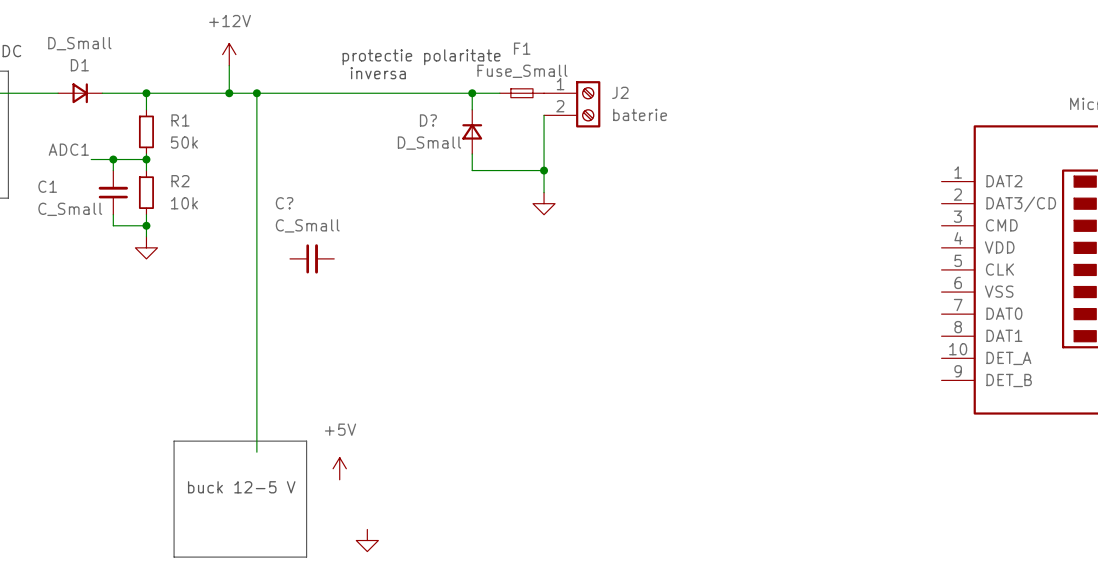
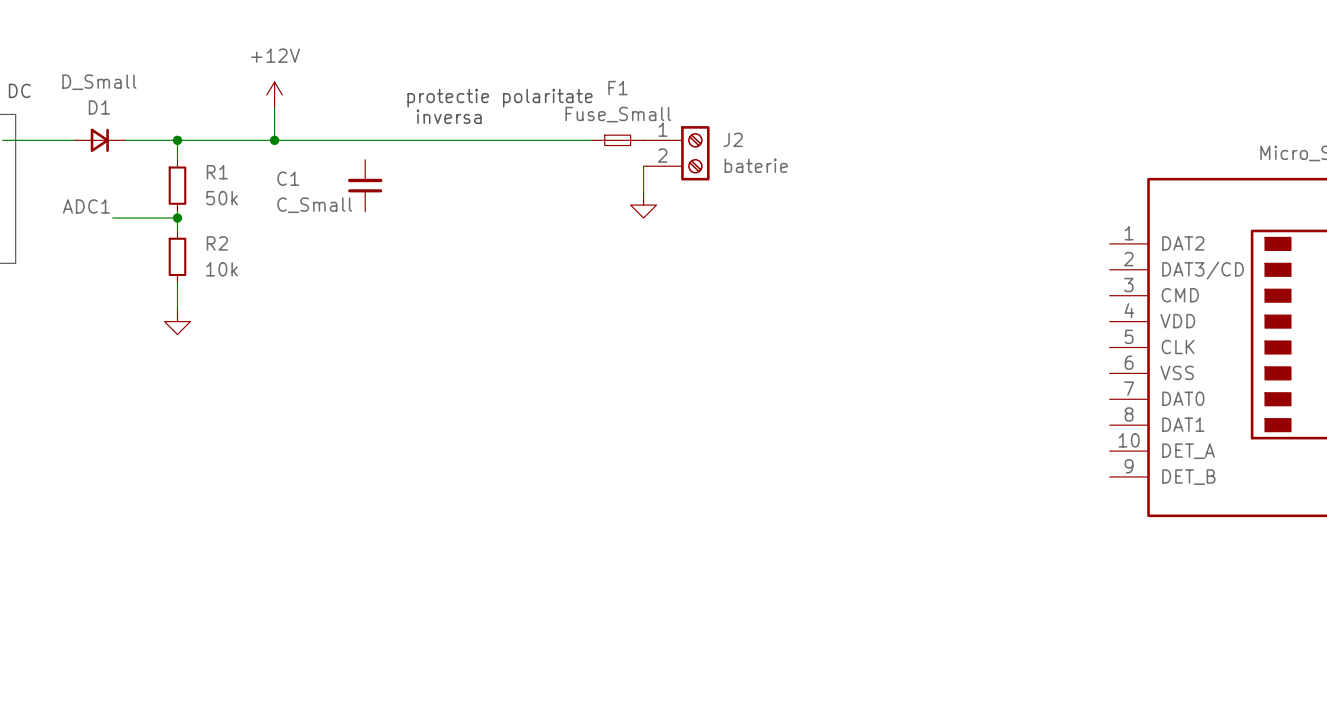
wire: (256, 93) (256, 452) -> none
junction: (256, 93) -> none
wire: (472, 93) (472, 109) -> none
junction: (472, 93) -> none
D?: D_Small (472, 131) -> none
wire: (544, 137) (544, 192) -> none
wire: (472, 153) (472, 170) (544, 170) -> none
wire: (113, 159) (113, 170) -> none
junction: (113, 159) -> none
junction: (544, 170) -> none
C1 position: (113, 192) -> (365, 185)
power symbol position: (544, 203) -> (643, 205)
wire: (113, 214) (113, 225) (146, 225) -> none
junction: (146, 225) -> none
C?: C_Small (312, 258) -> none
line: (174, 441) (174, 557) (306, 557) (306, 441) (174, 441) -> none
power symbol: +5V (339, 468) -> none
text: buck 12-5 V (241, 487) -> none
power symbol: (367, 540) -> none

